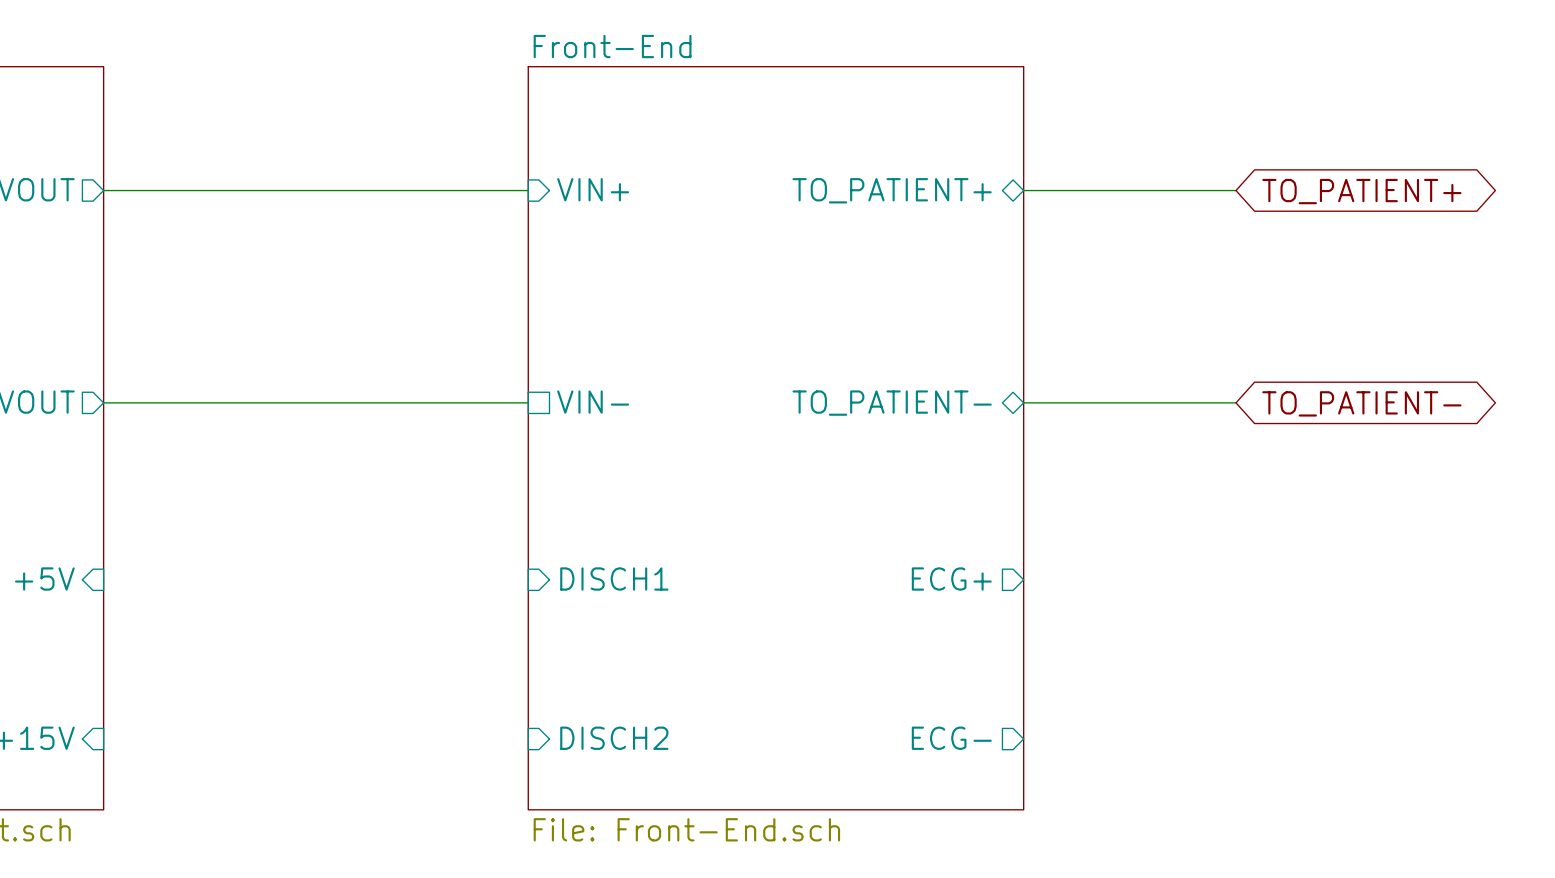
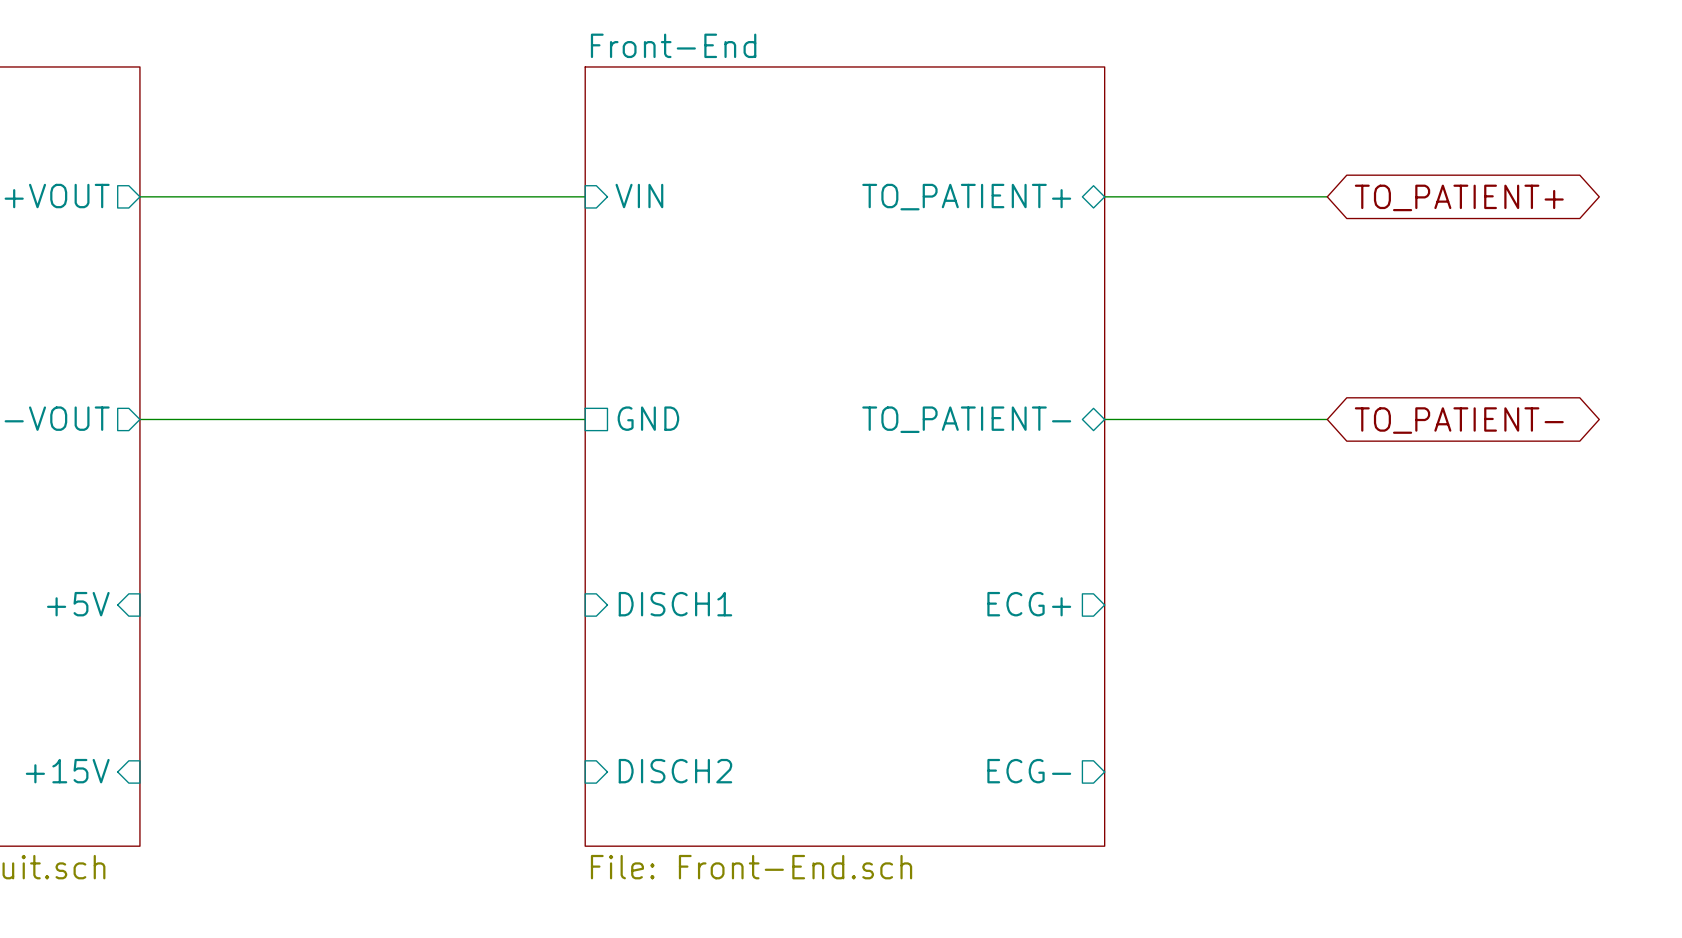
sheet pin: VIN+ (593, 189) -> VIN (639, 196)
sheet pin: VIN- (593, 402) -> GND (648, 418)

